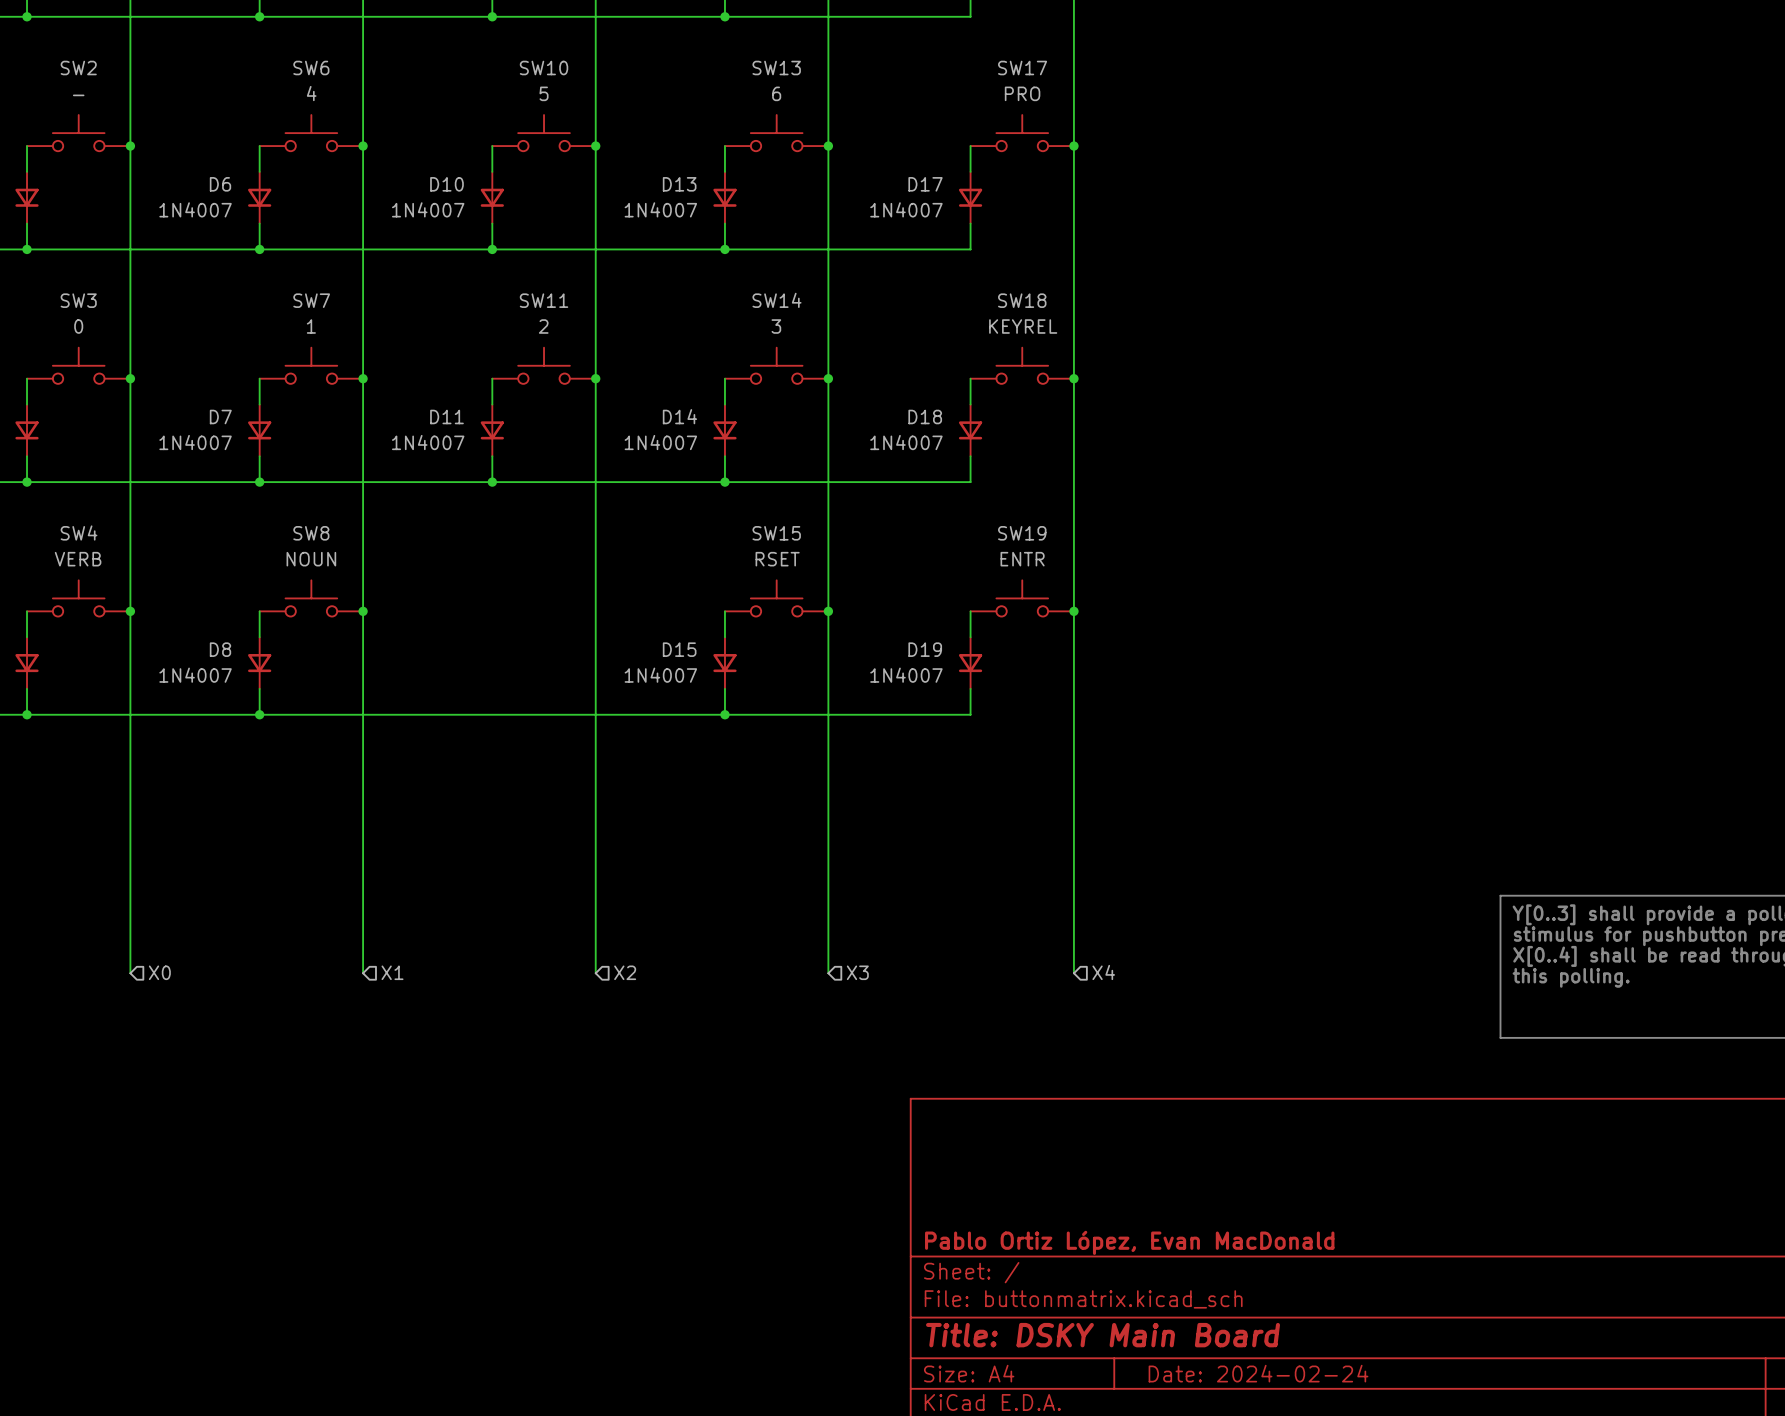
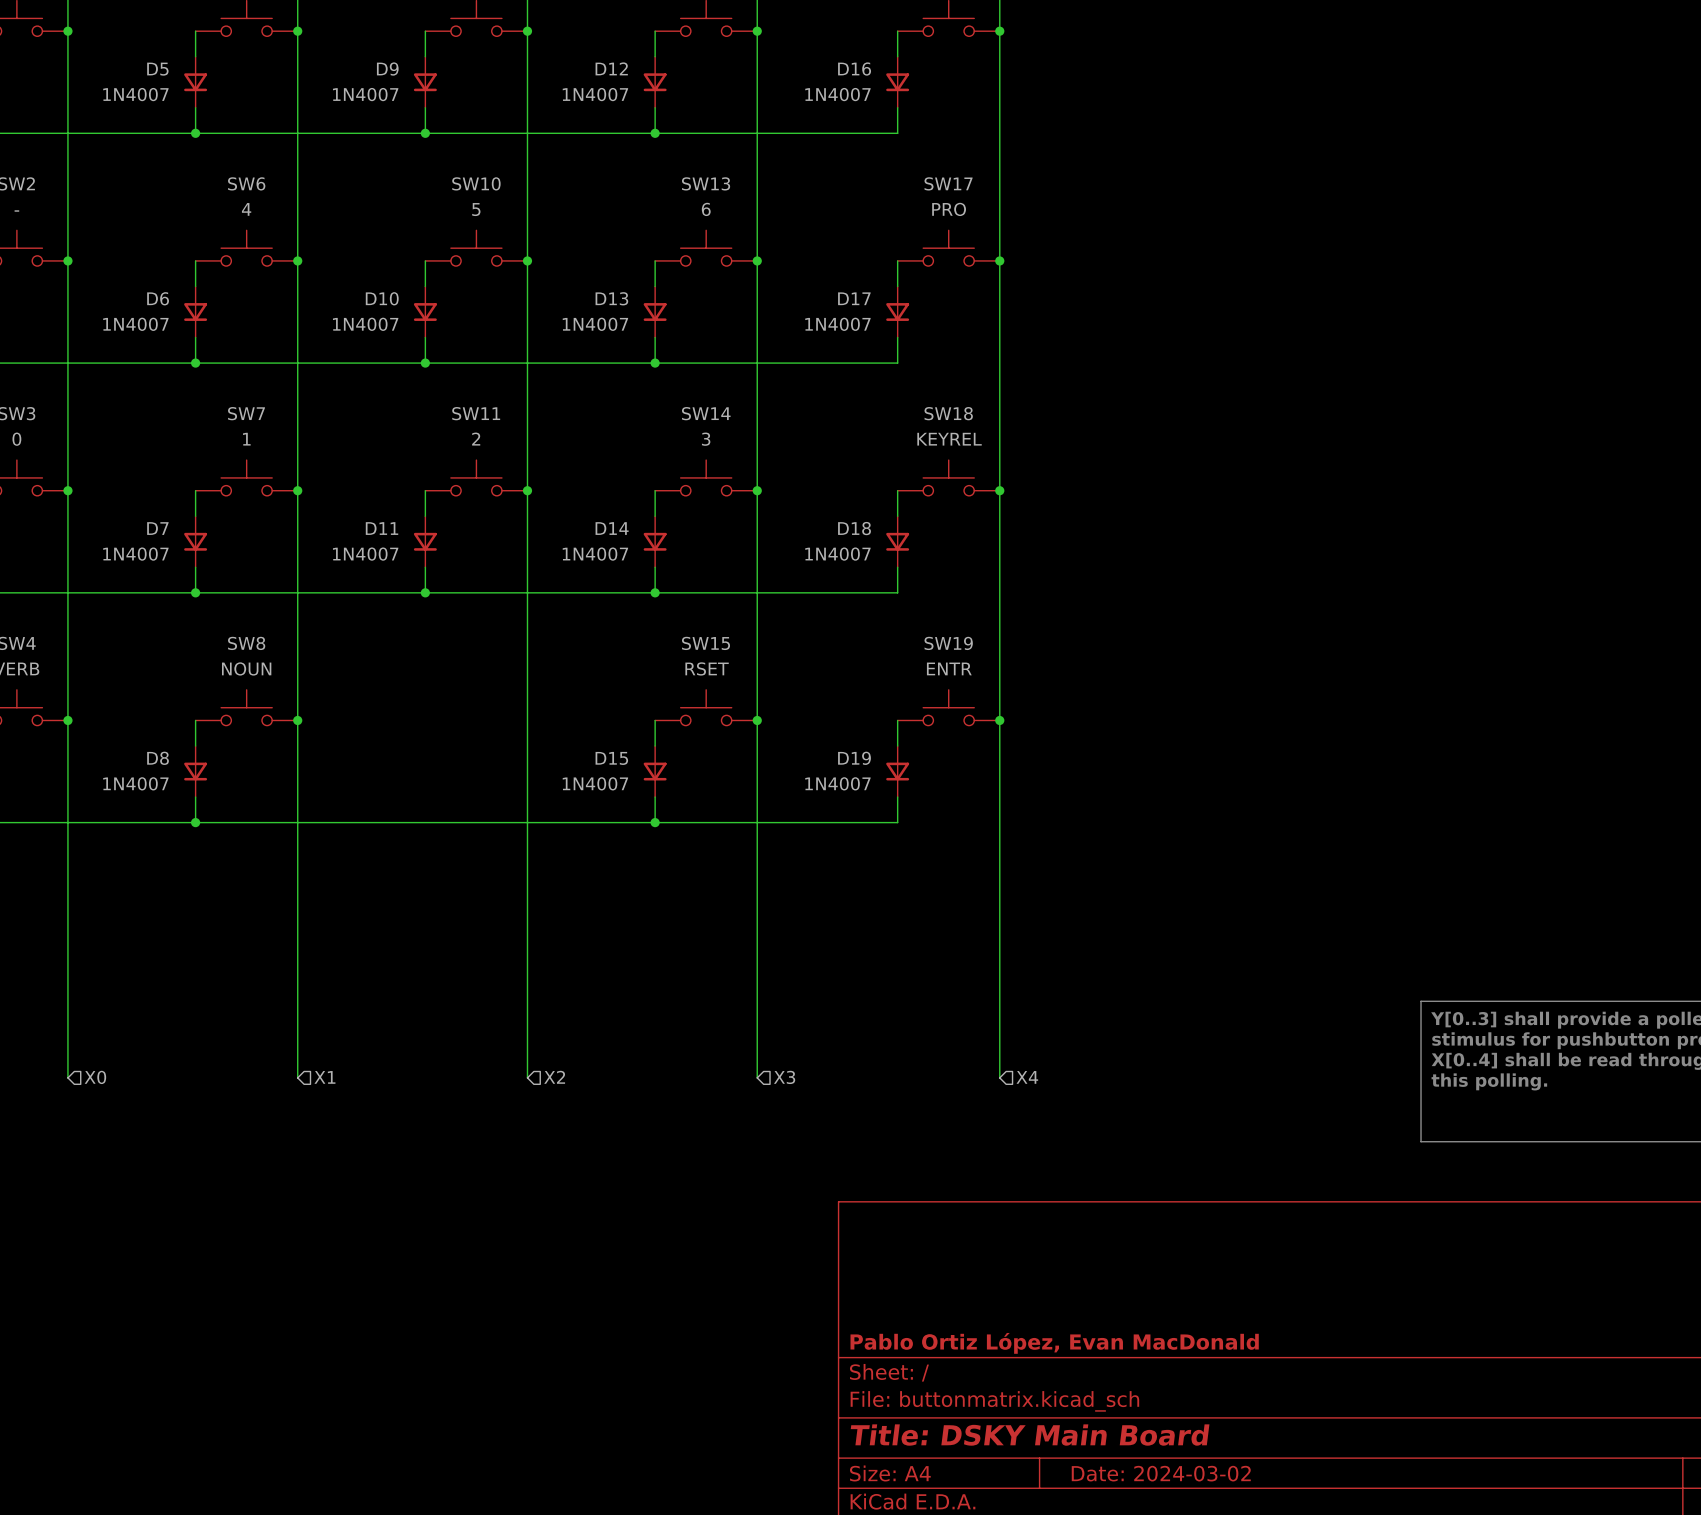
title block: Date: 2024-02-24 (1258, 1373) -> Date: 2024-03-02 (1161, 1473)

